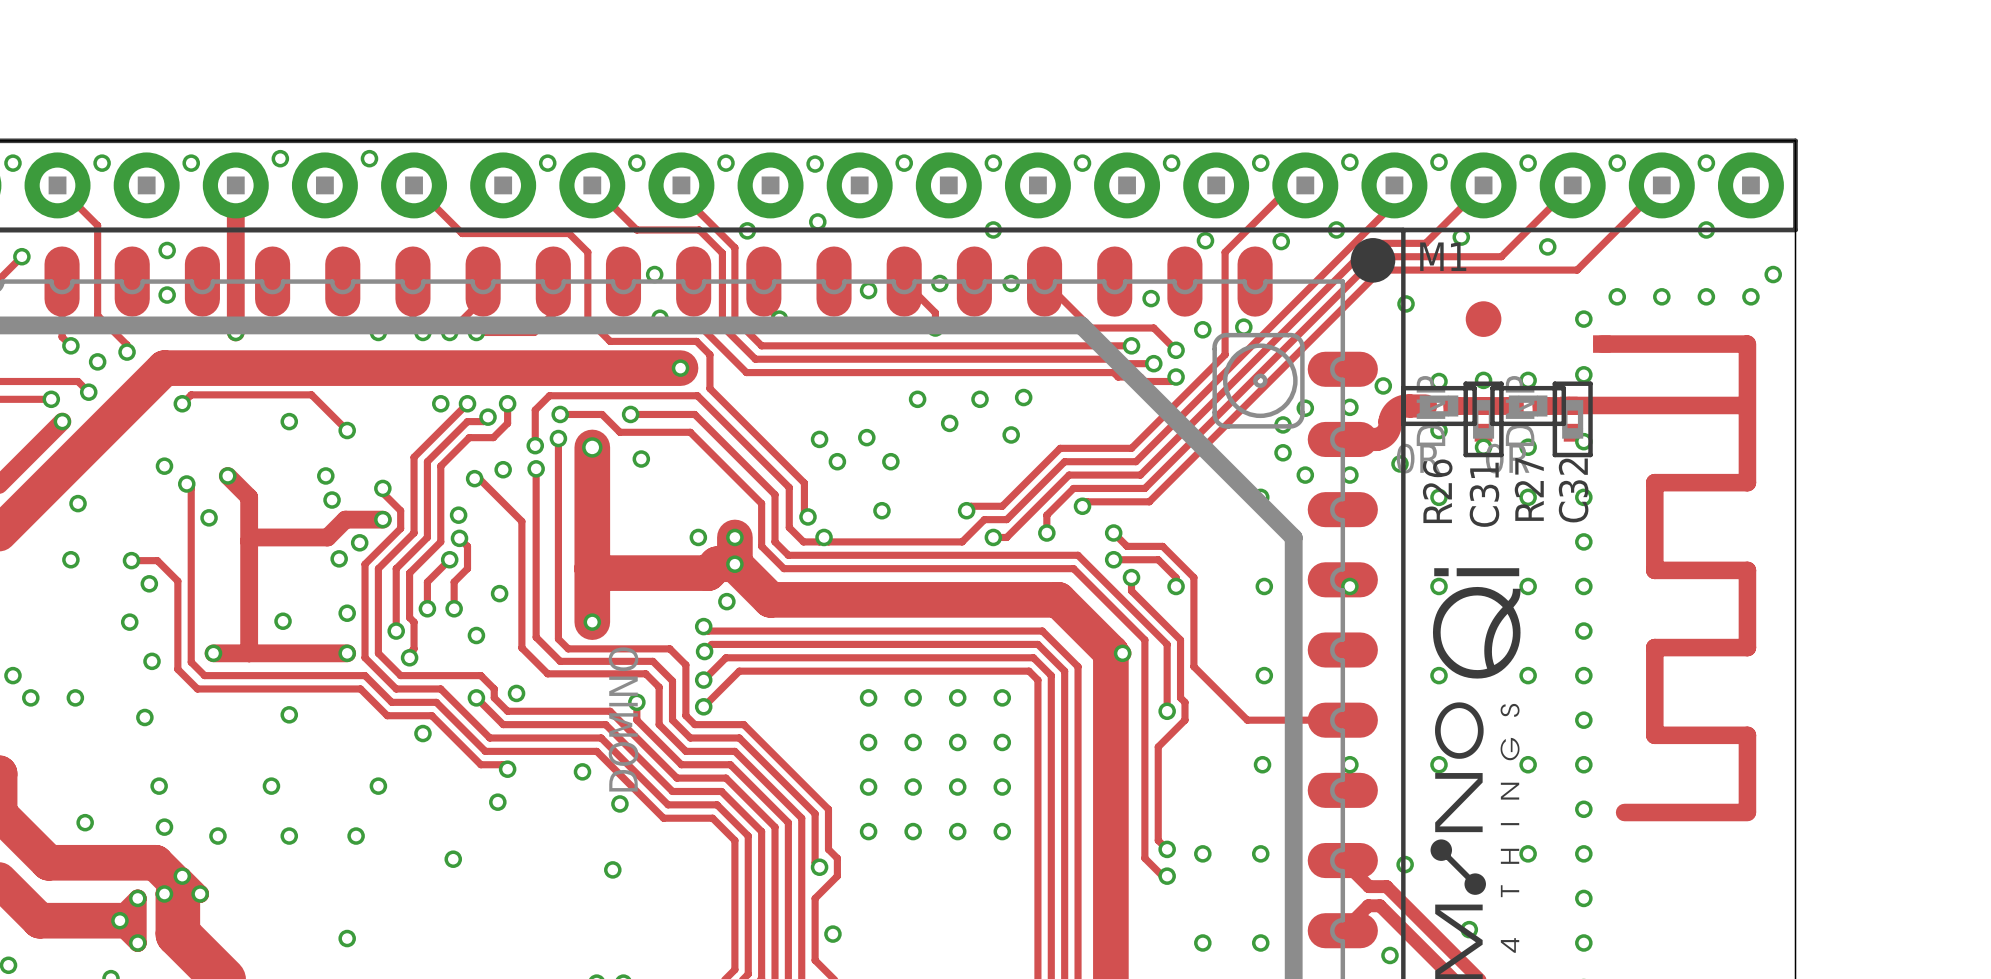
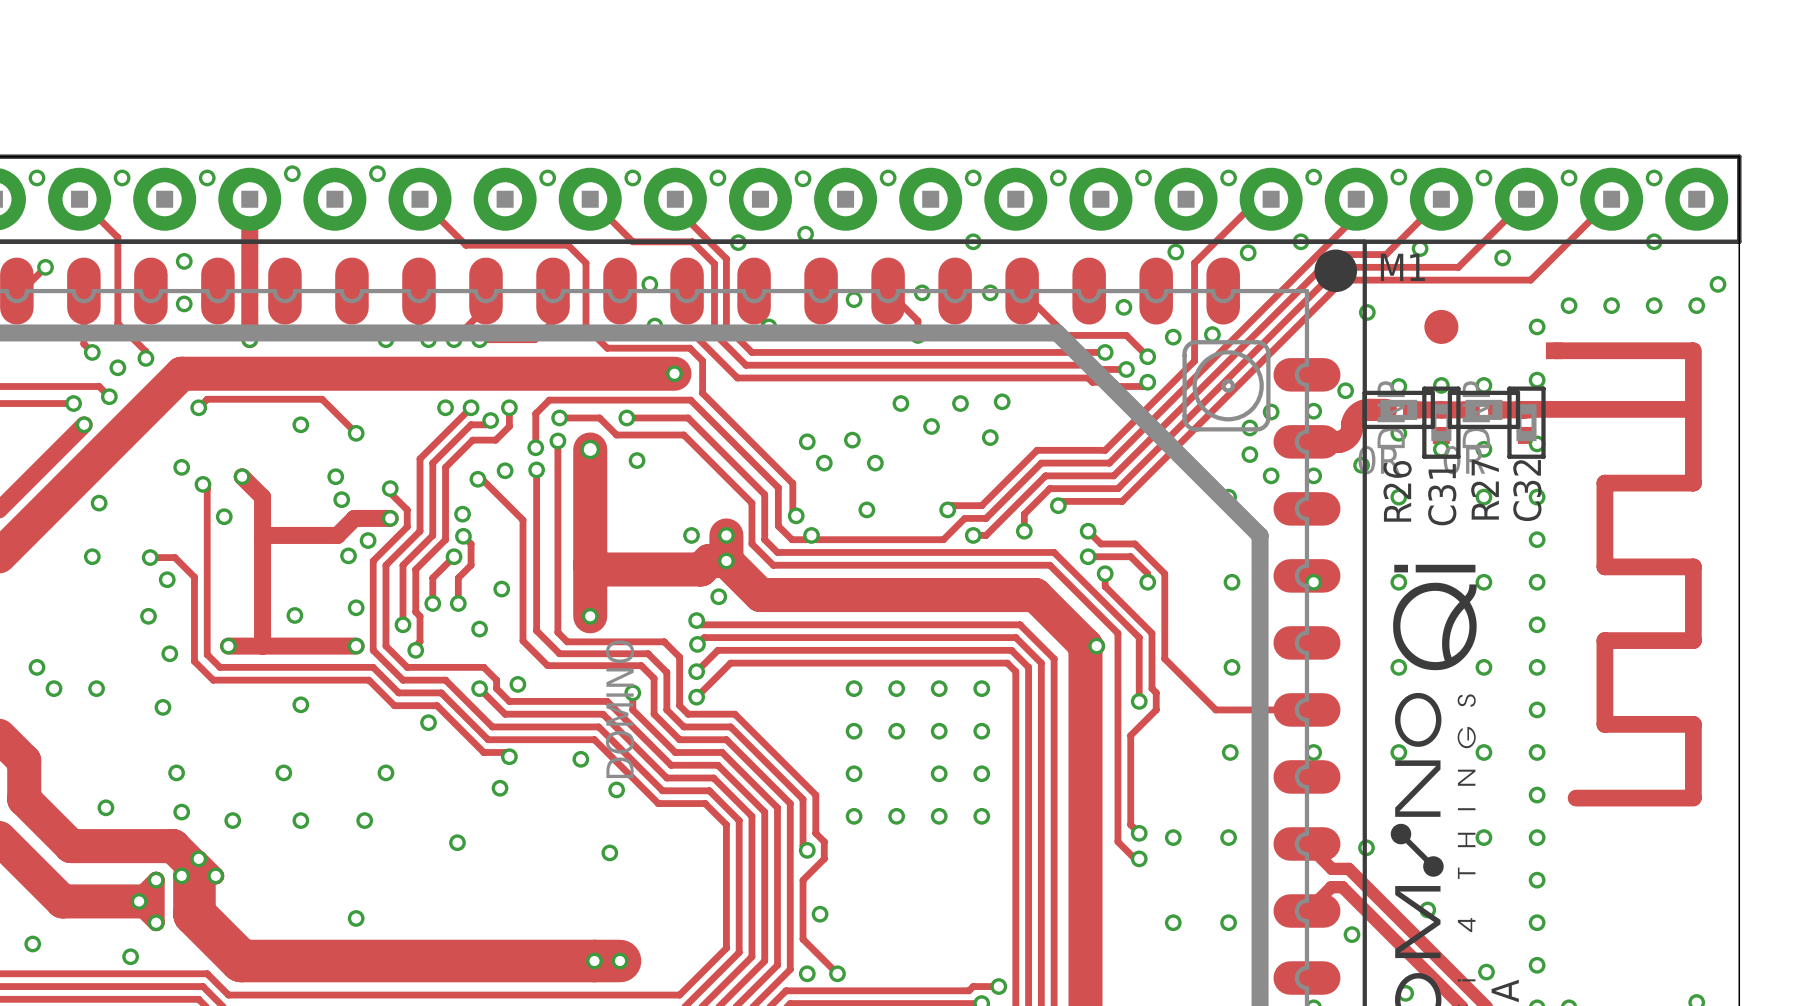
via: (913, 787) -> none

